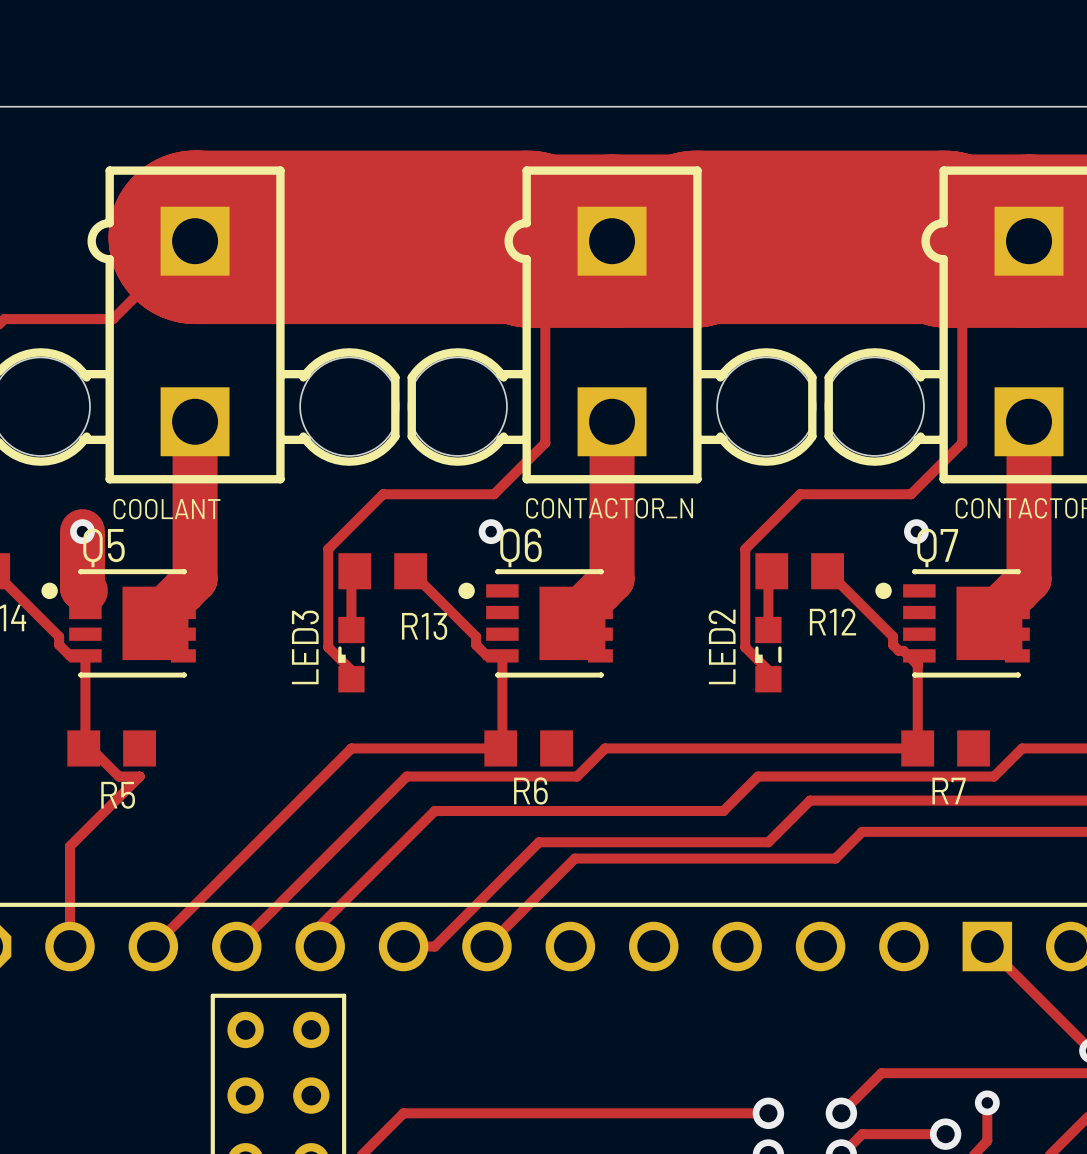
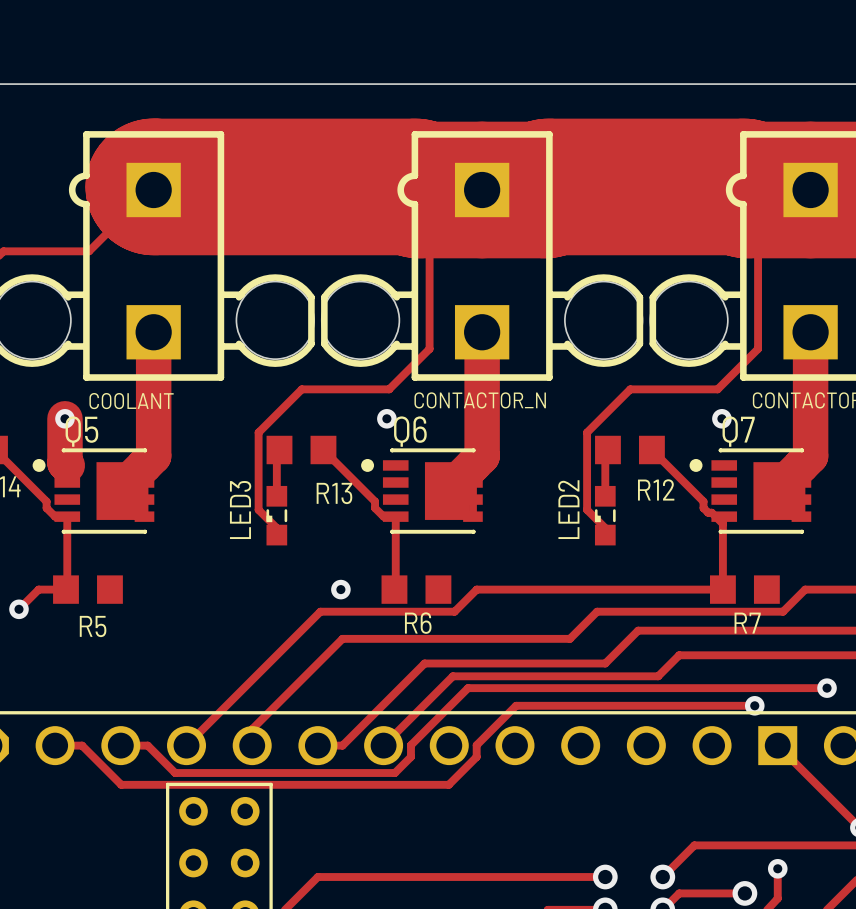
track: (83, 748) (90, 748) (119, 776) (139, 776) (69, 846) (69, 946) -> (65, 589) (38, 589) (18, 609)
via: none -> (340, 589)
track: (500, 748) (351, 748) (153, 946) -> (827, 688) (468, 688) (410, 745) (410, 756) (394, 773) (175, 773) (147, 745) (120, 745)
via: none -> (18, 609)
via: none -> (827, 688)
track: none -> (754, 705) (516, 705) (476, 745) (476, 756) (448, 784) (121, 784) (82, 745) (55, 745)
via: none -> (754, 705)

